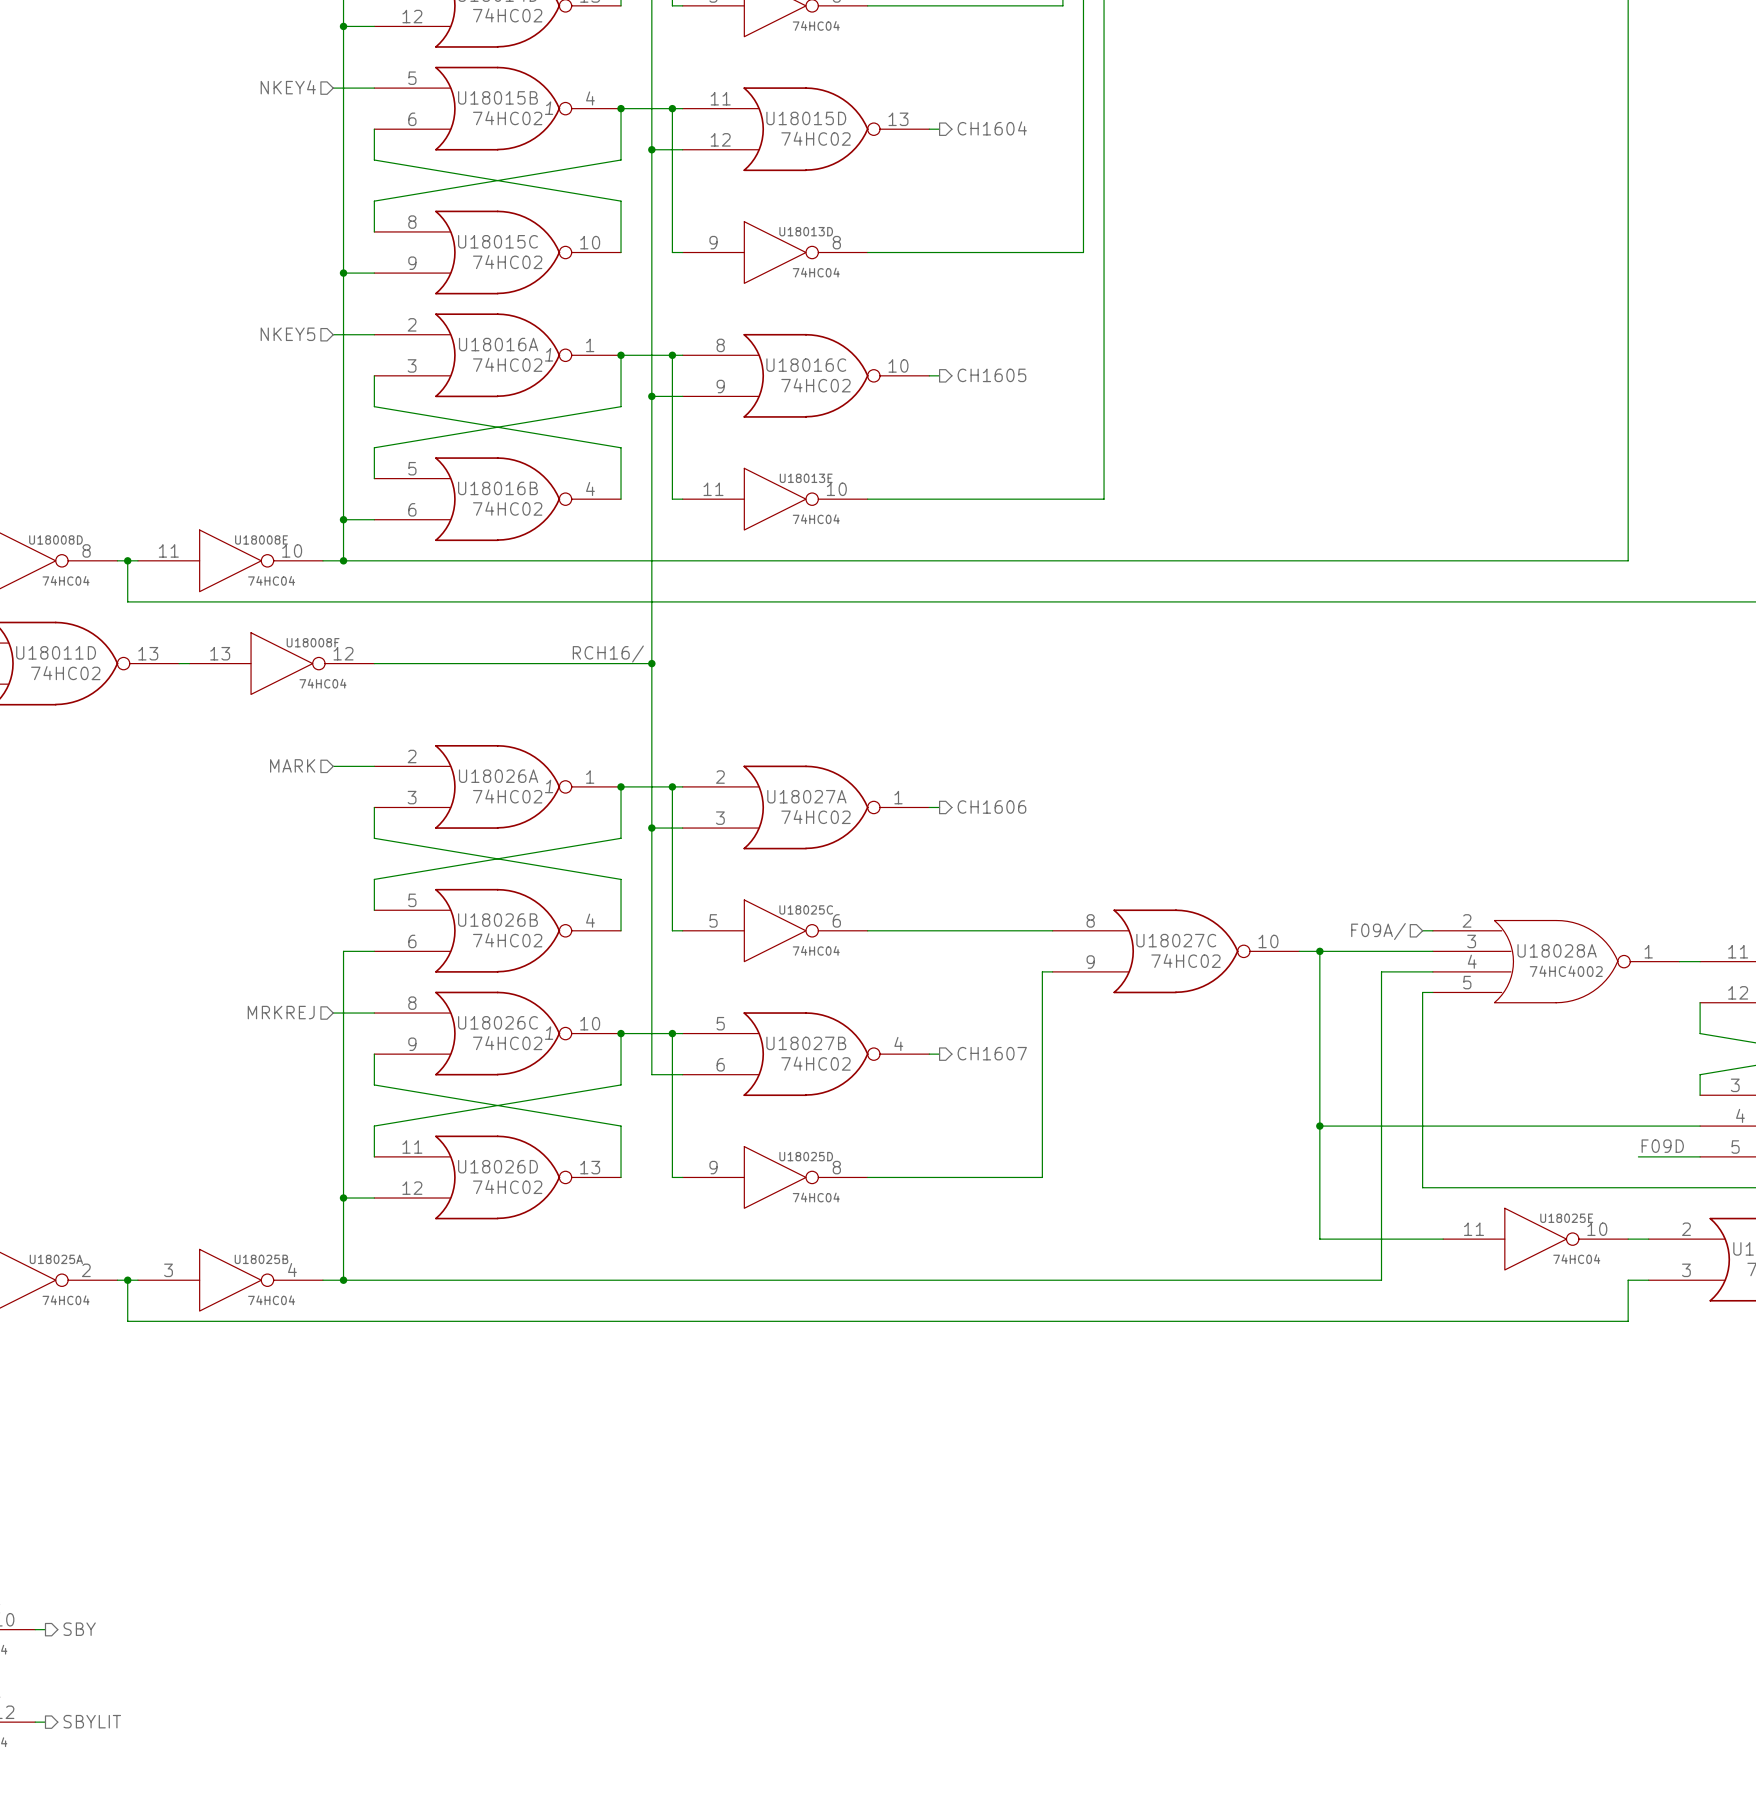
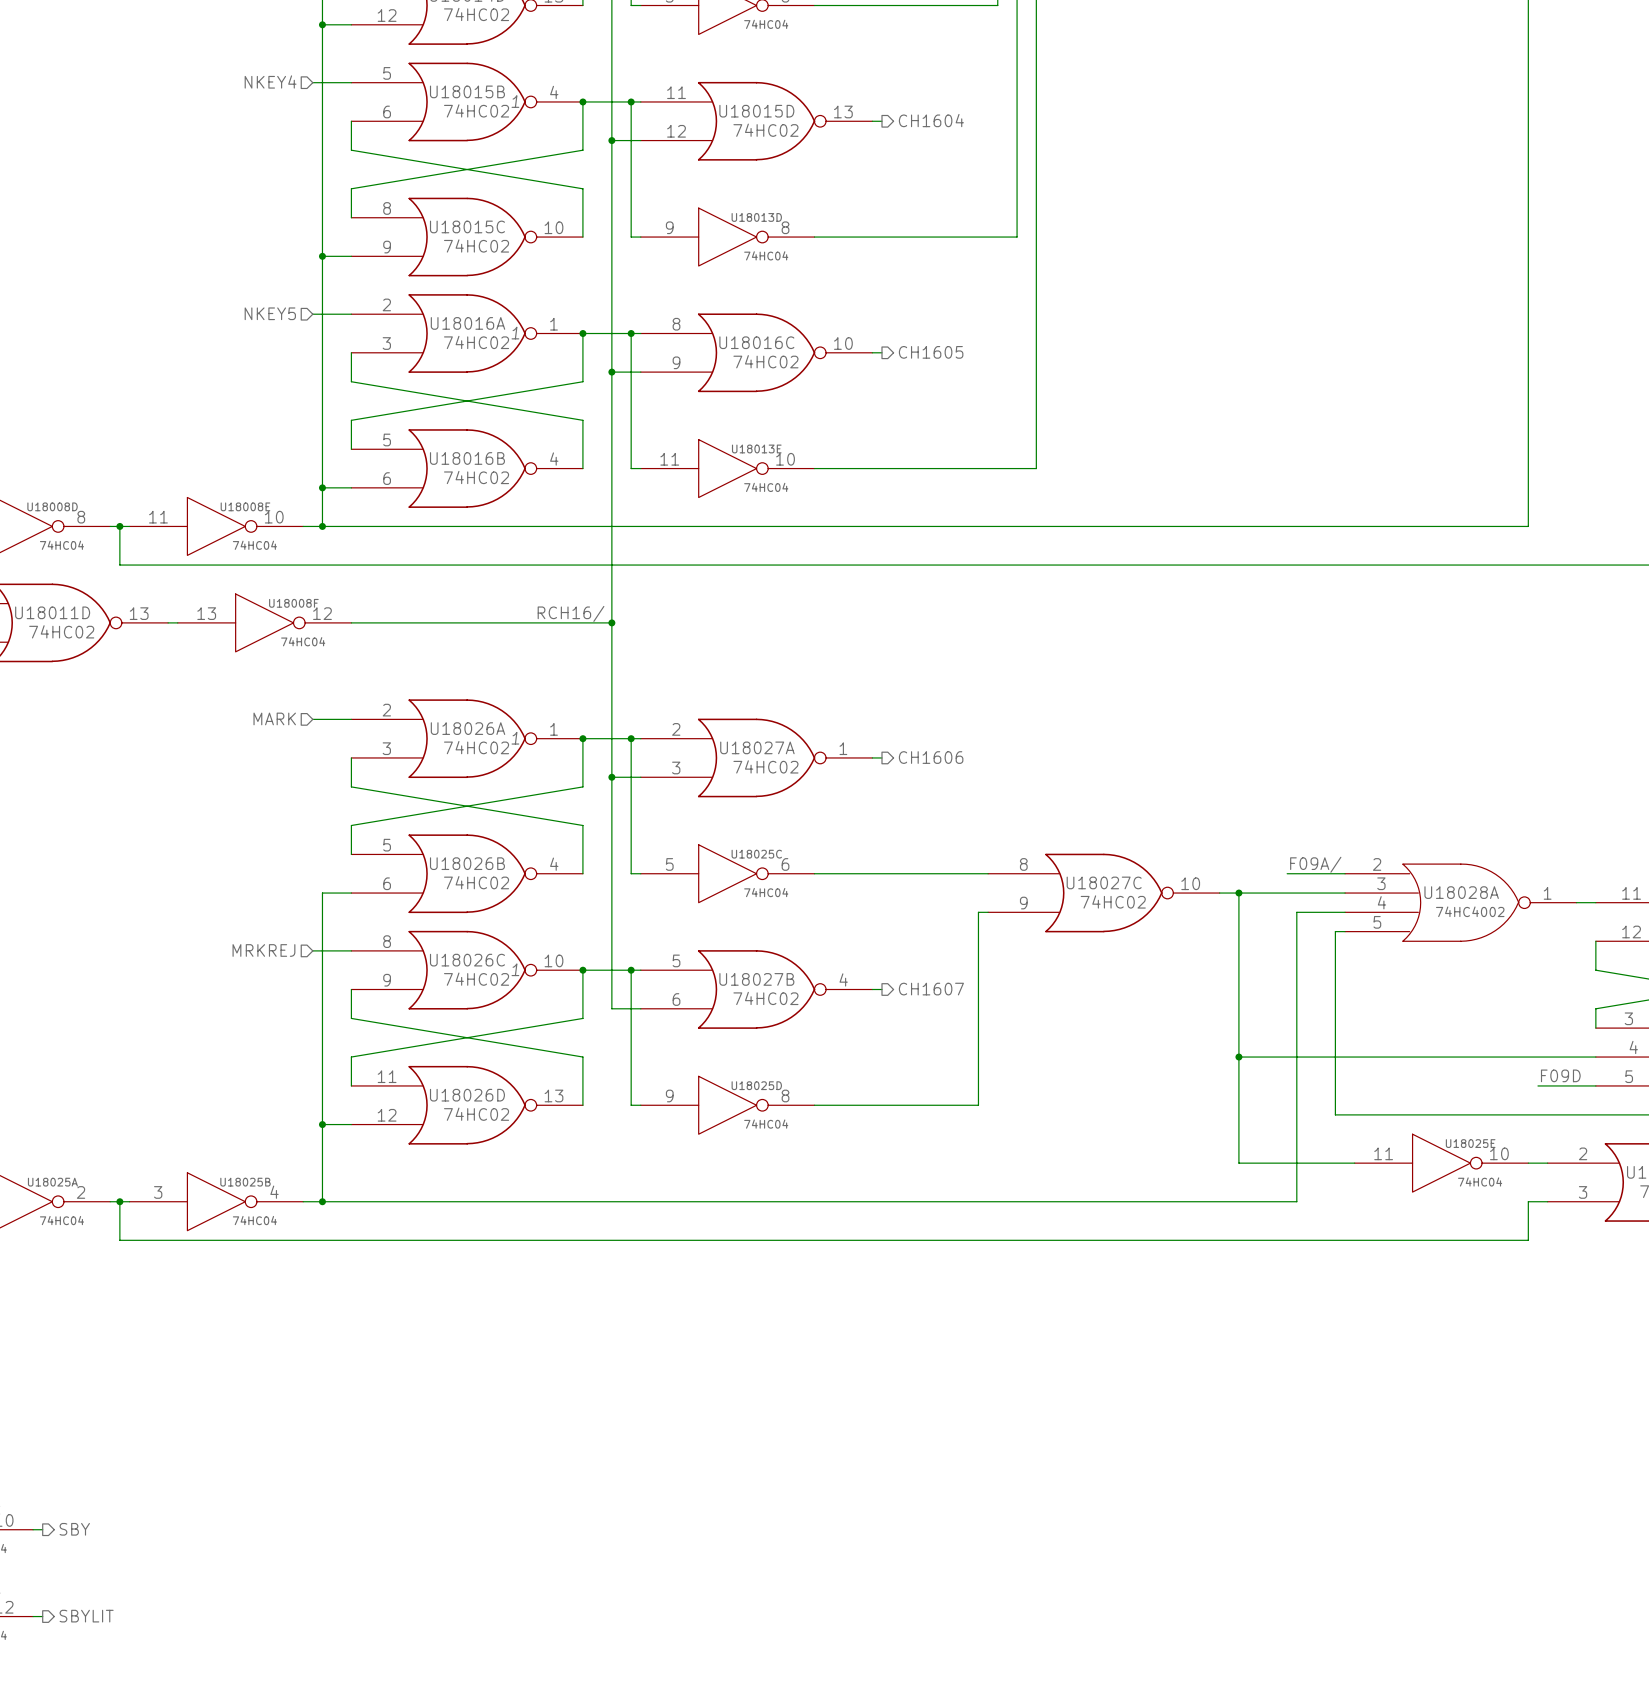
label: none -> F09A/ (1315, 864)
wire: none -> (1287, 873) (1335, 873)
hierarchical label: F09A/ (1378, 931) -> none

